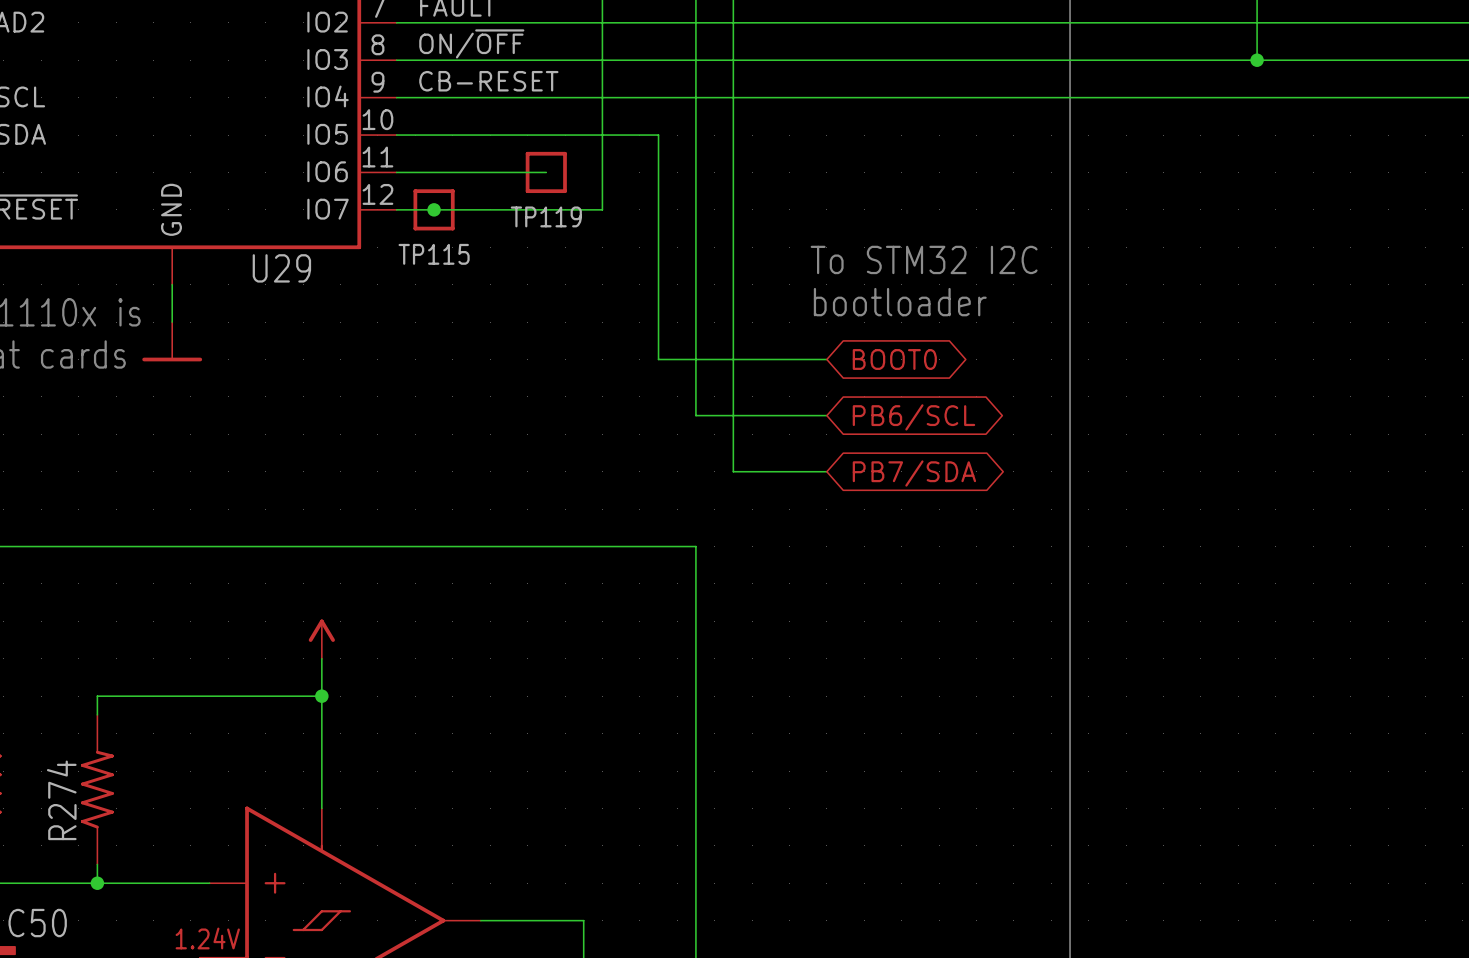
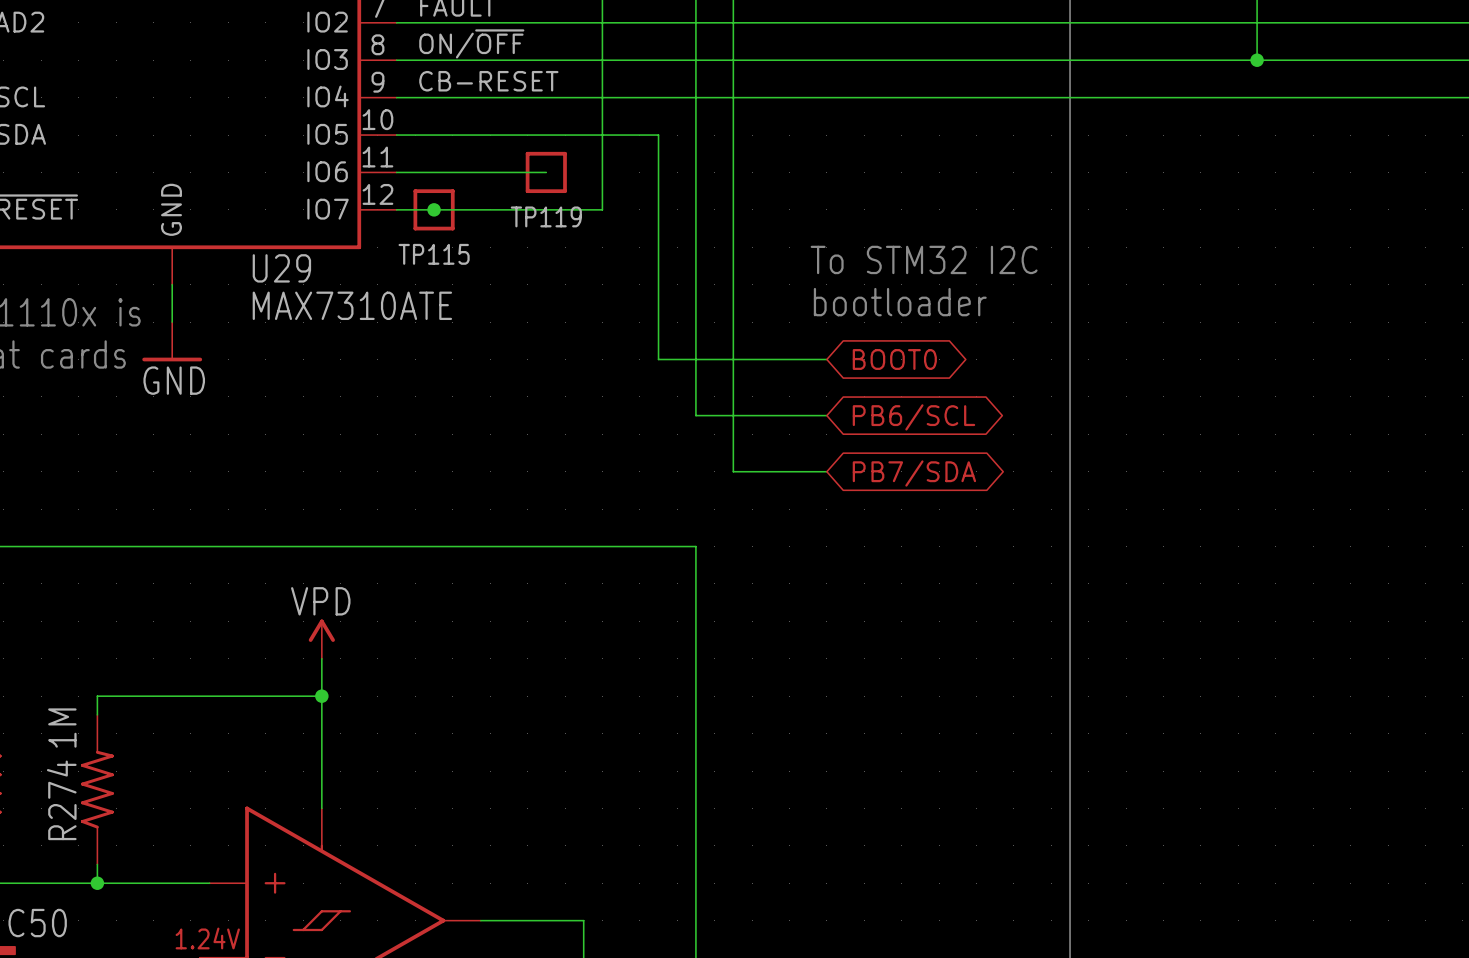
U29 value: none -> MAX7310ATE (352, 305)
power symbol text: none -> GND (174, 380)
power symbol text: none -> VPD (320, 601)
R274 value: none -> 1M (62, 728)

